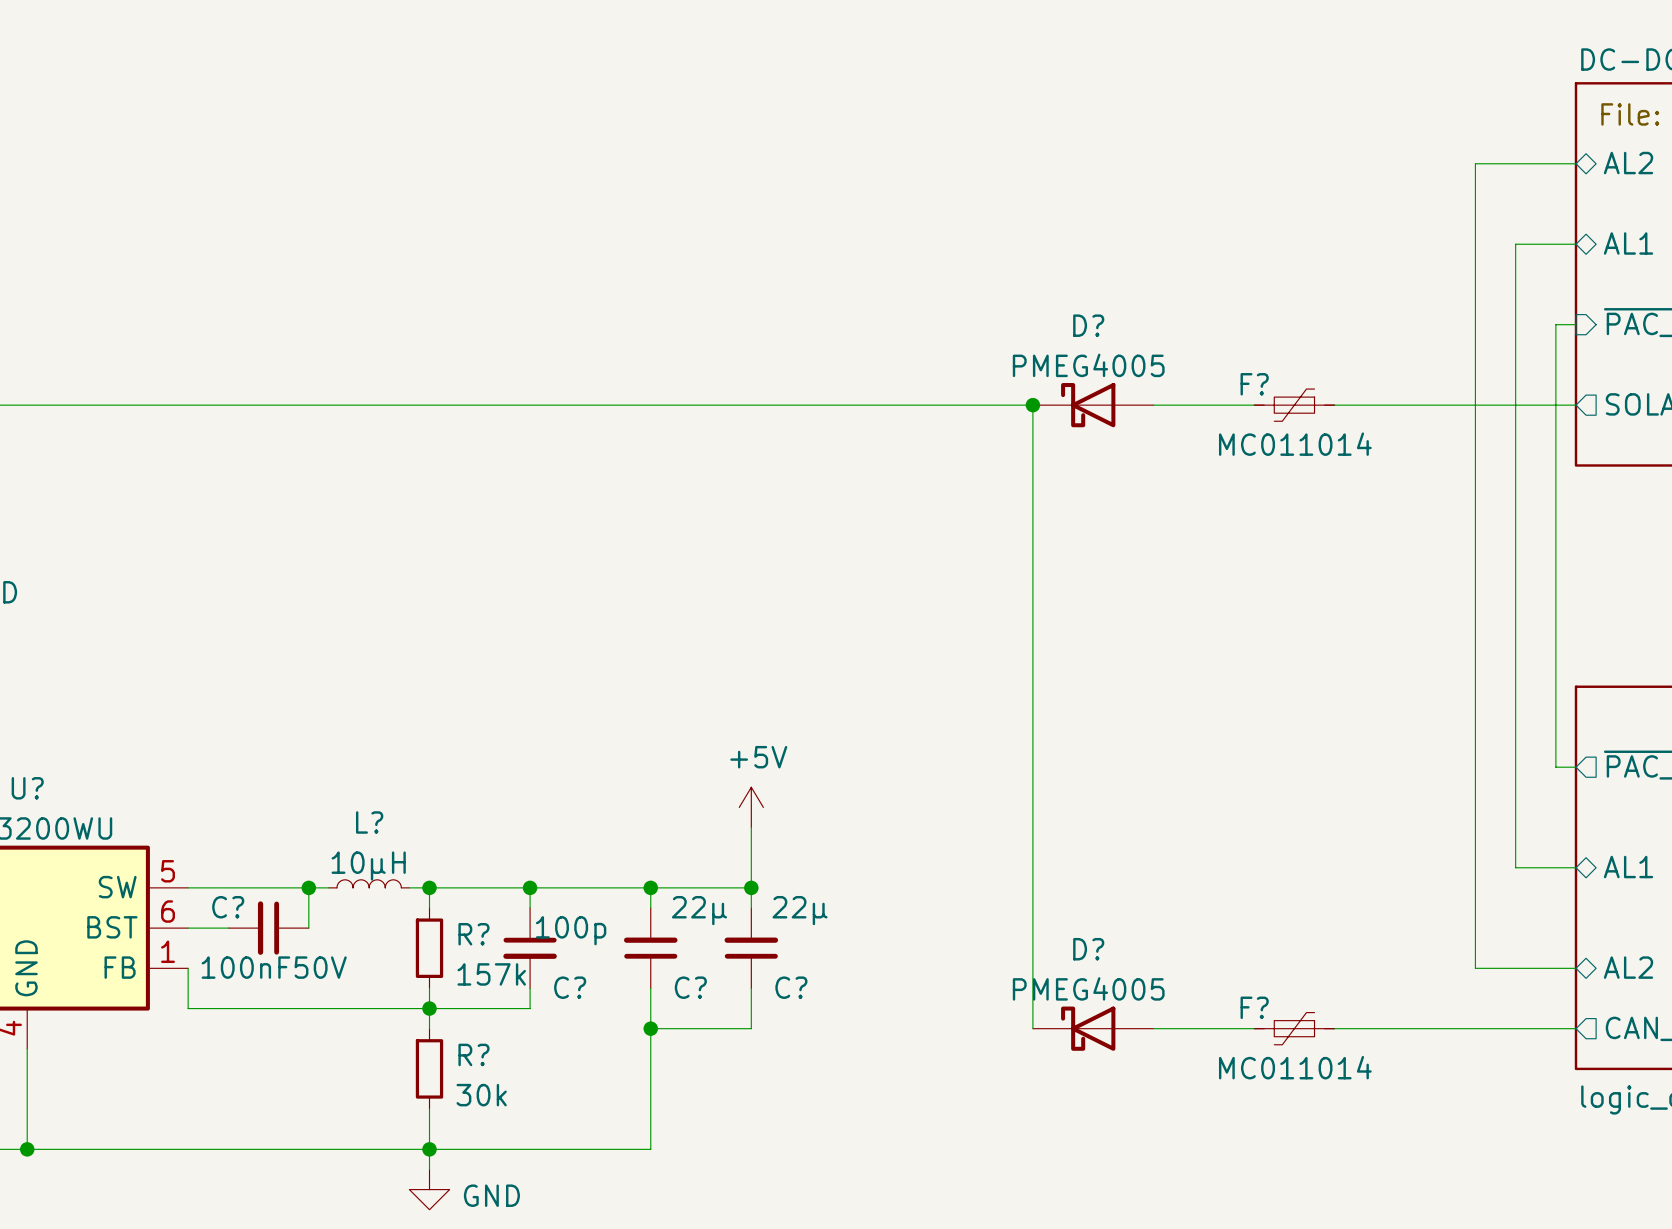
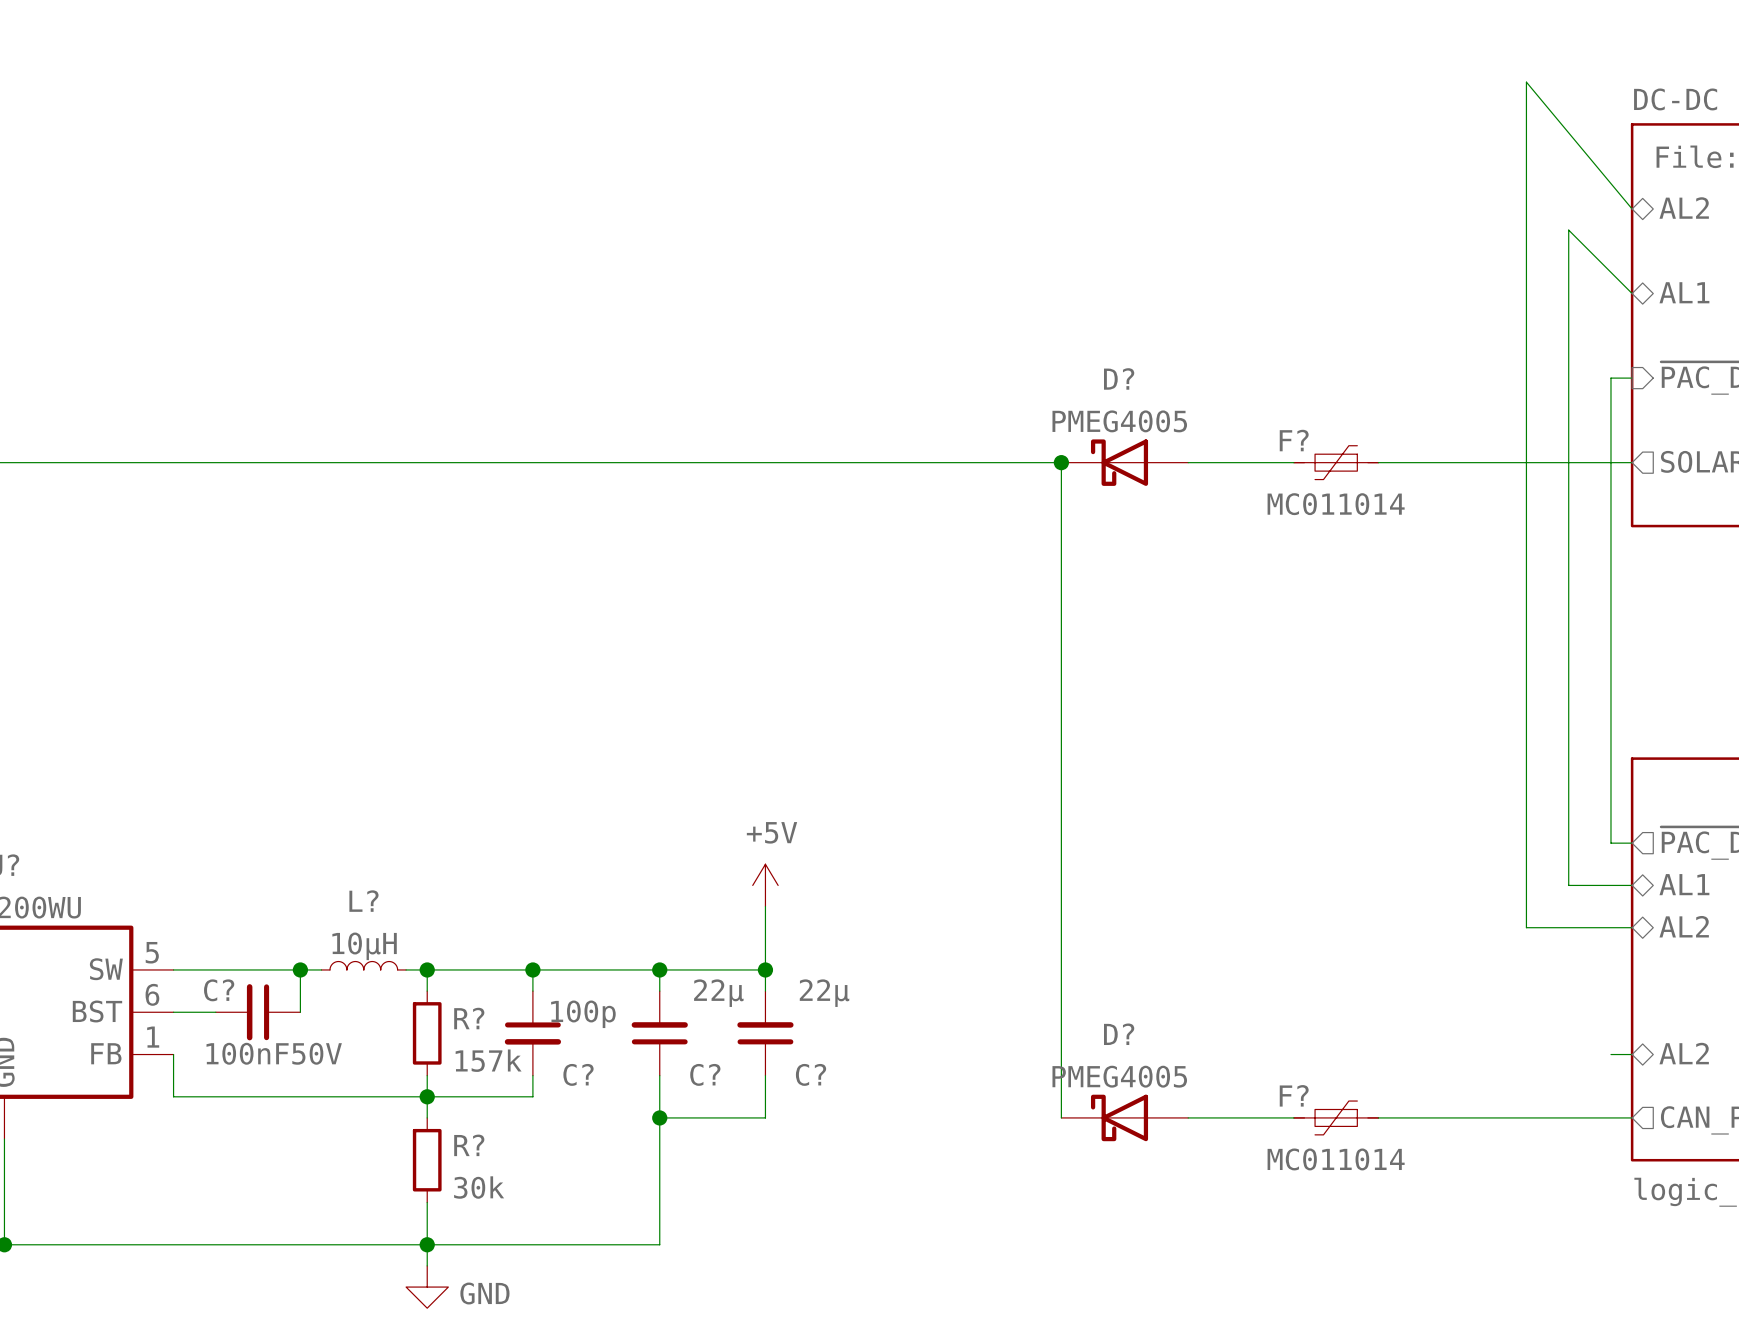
wire: (1475, 163) (1575, 163) -> (1526, 208) (1526, 82) (1632, 208)
wire: (1515, 244) (1575, 244) -> (1568, 293) (1568, 230) (1632, 293)
wire: (1515, 807) (1515, 867) (1575, 867) -> (1568, 885) (1632, 885)
sheet pin: none -> AL2 (1684, 926)
wire: (1475, 847) (1475, 968) (1555, 968) -> (1526, 927) (1632, 927)
sheet pin position: AL1 (1628, 867) -> AL1 (1684, 884)

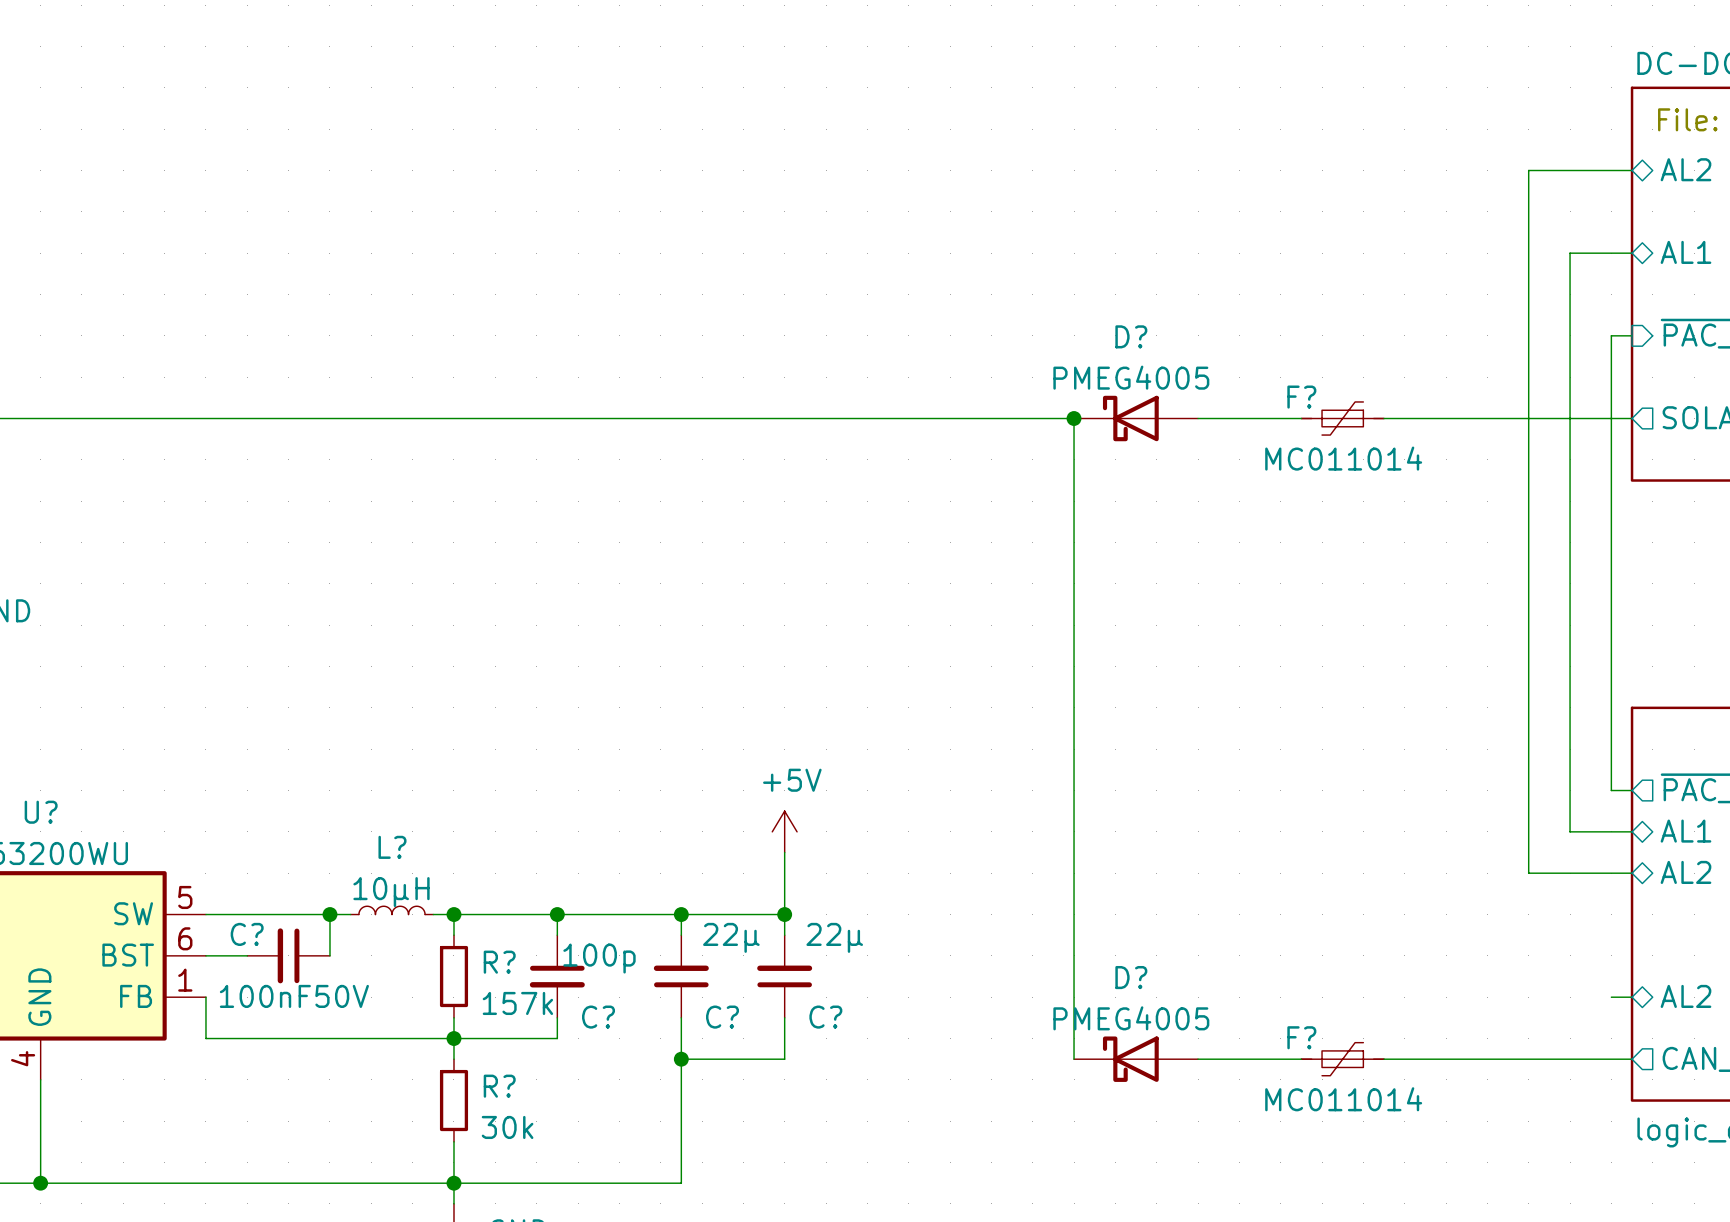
wire: (1526, 208) (1526, 82) (1632, 208) -> (1528, 170) (1632, 170)
wire: (1568, 293) (1568, 230) (1632, 293) -> (1570, 253) (1632, 253)

